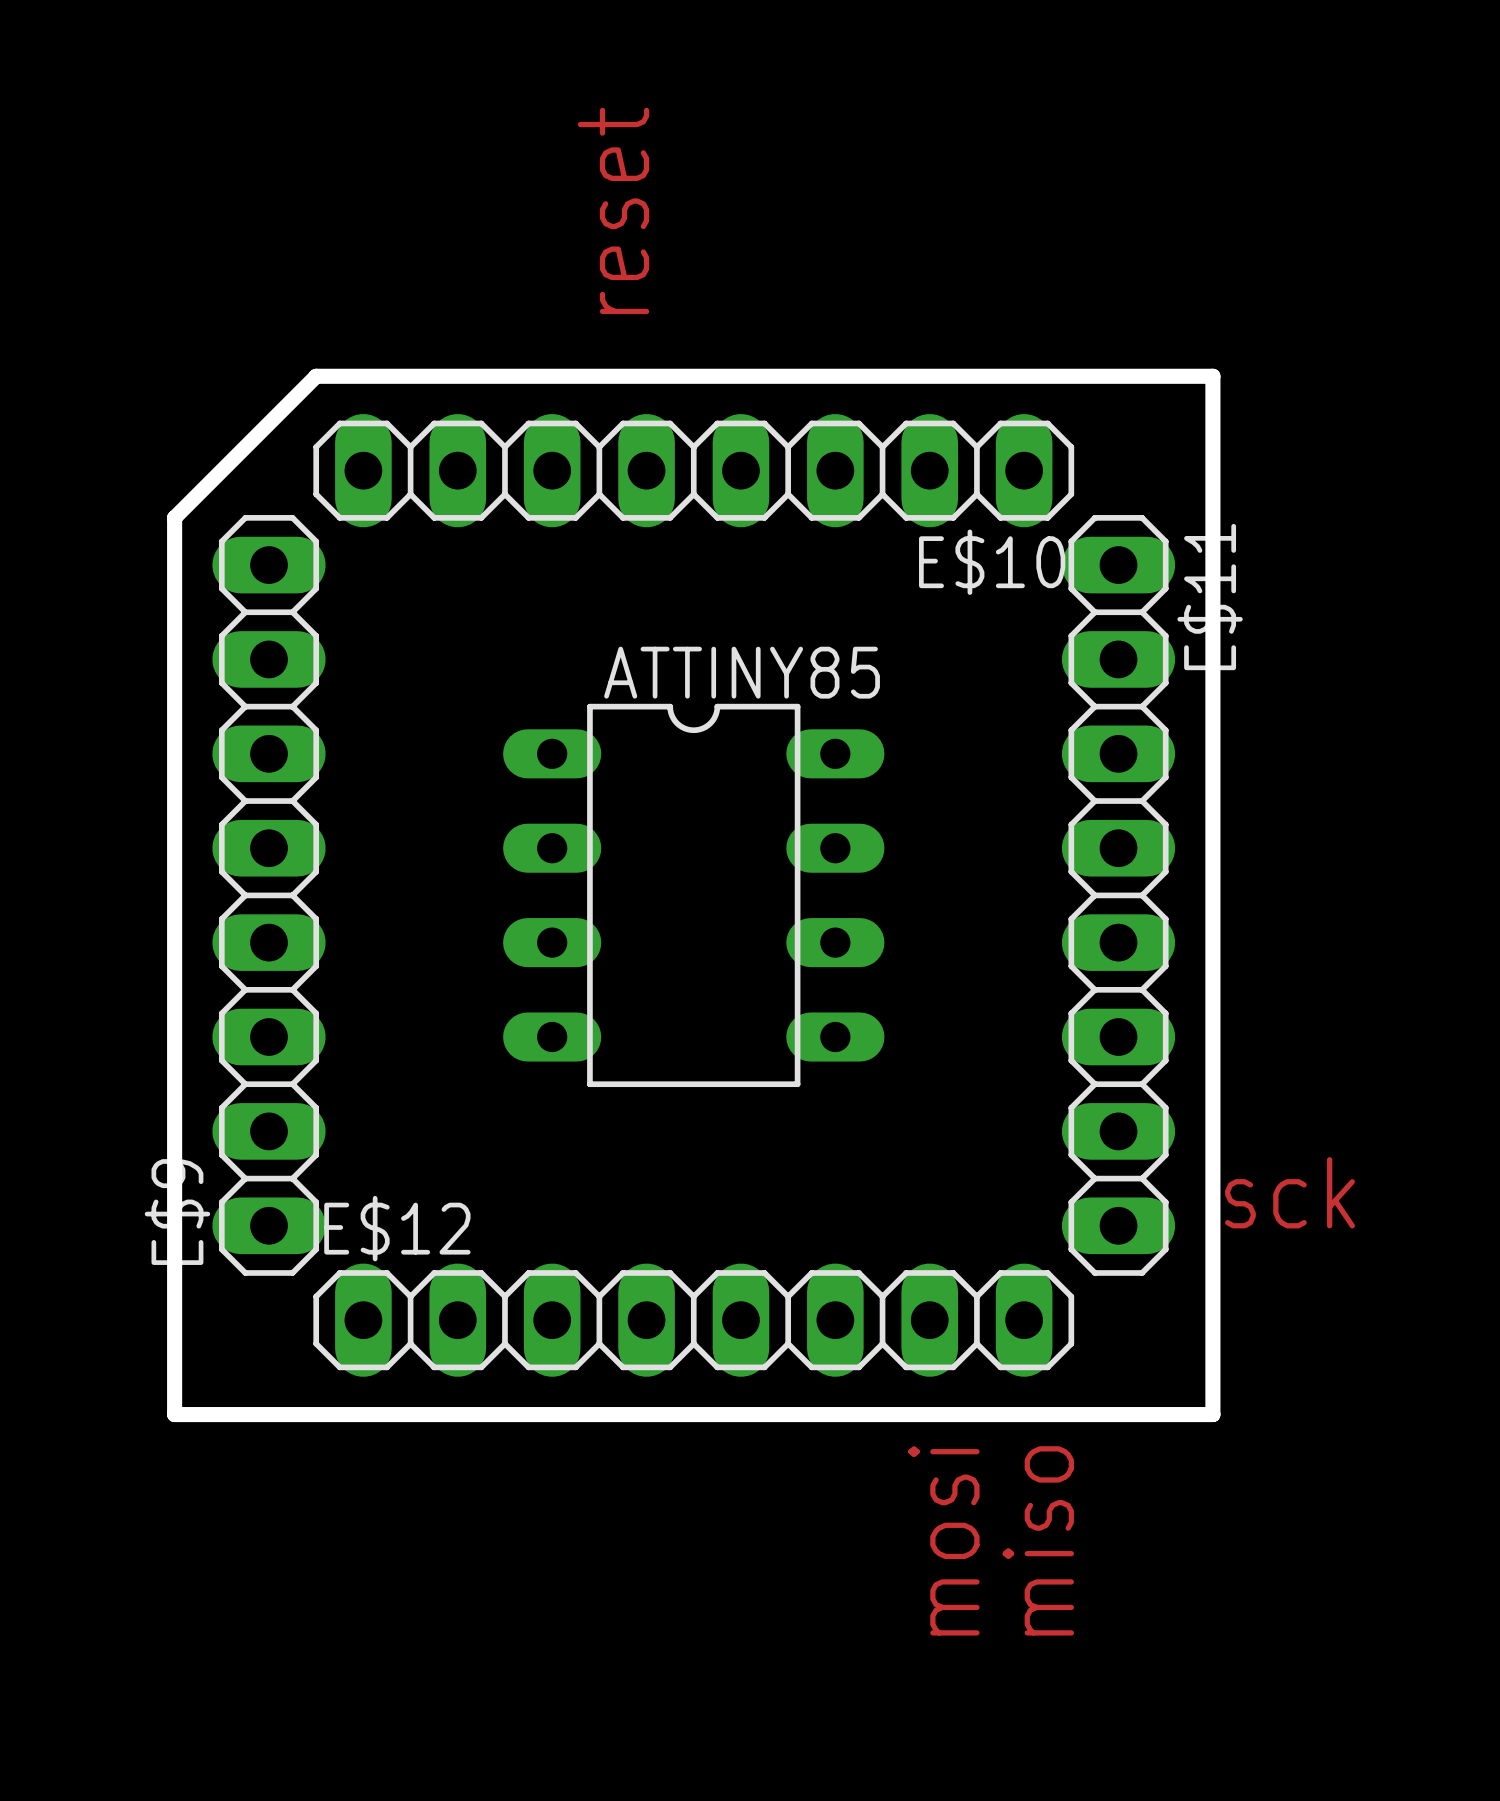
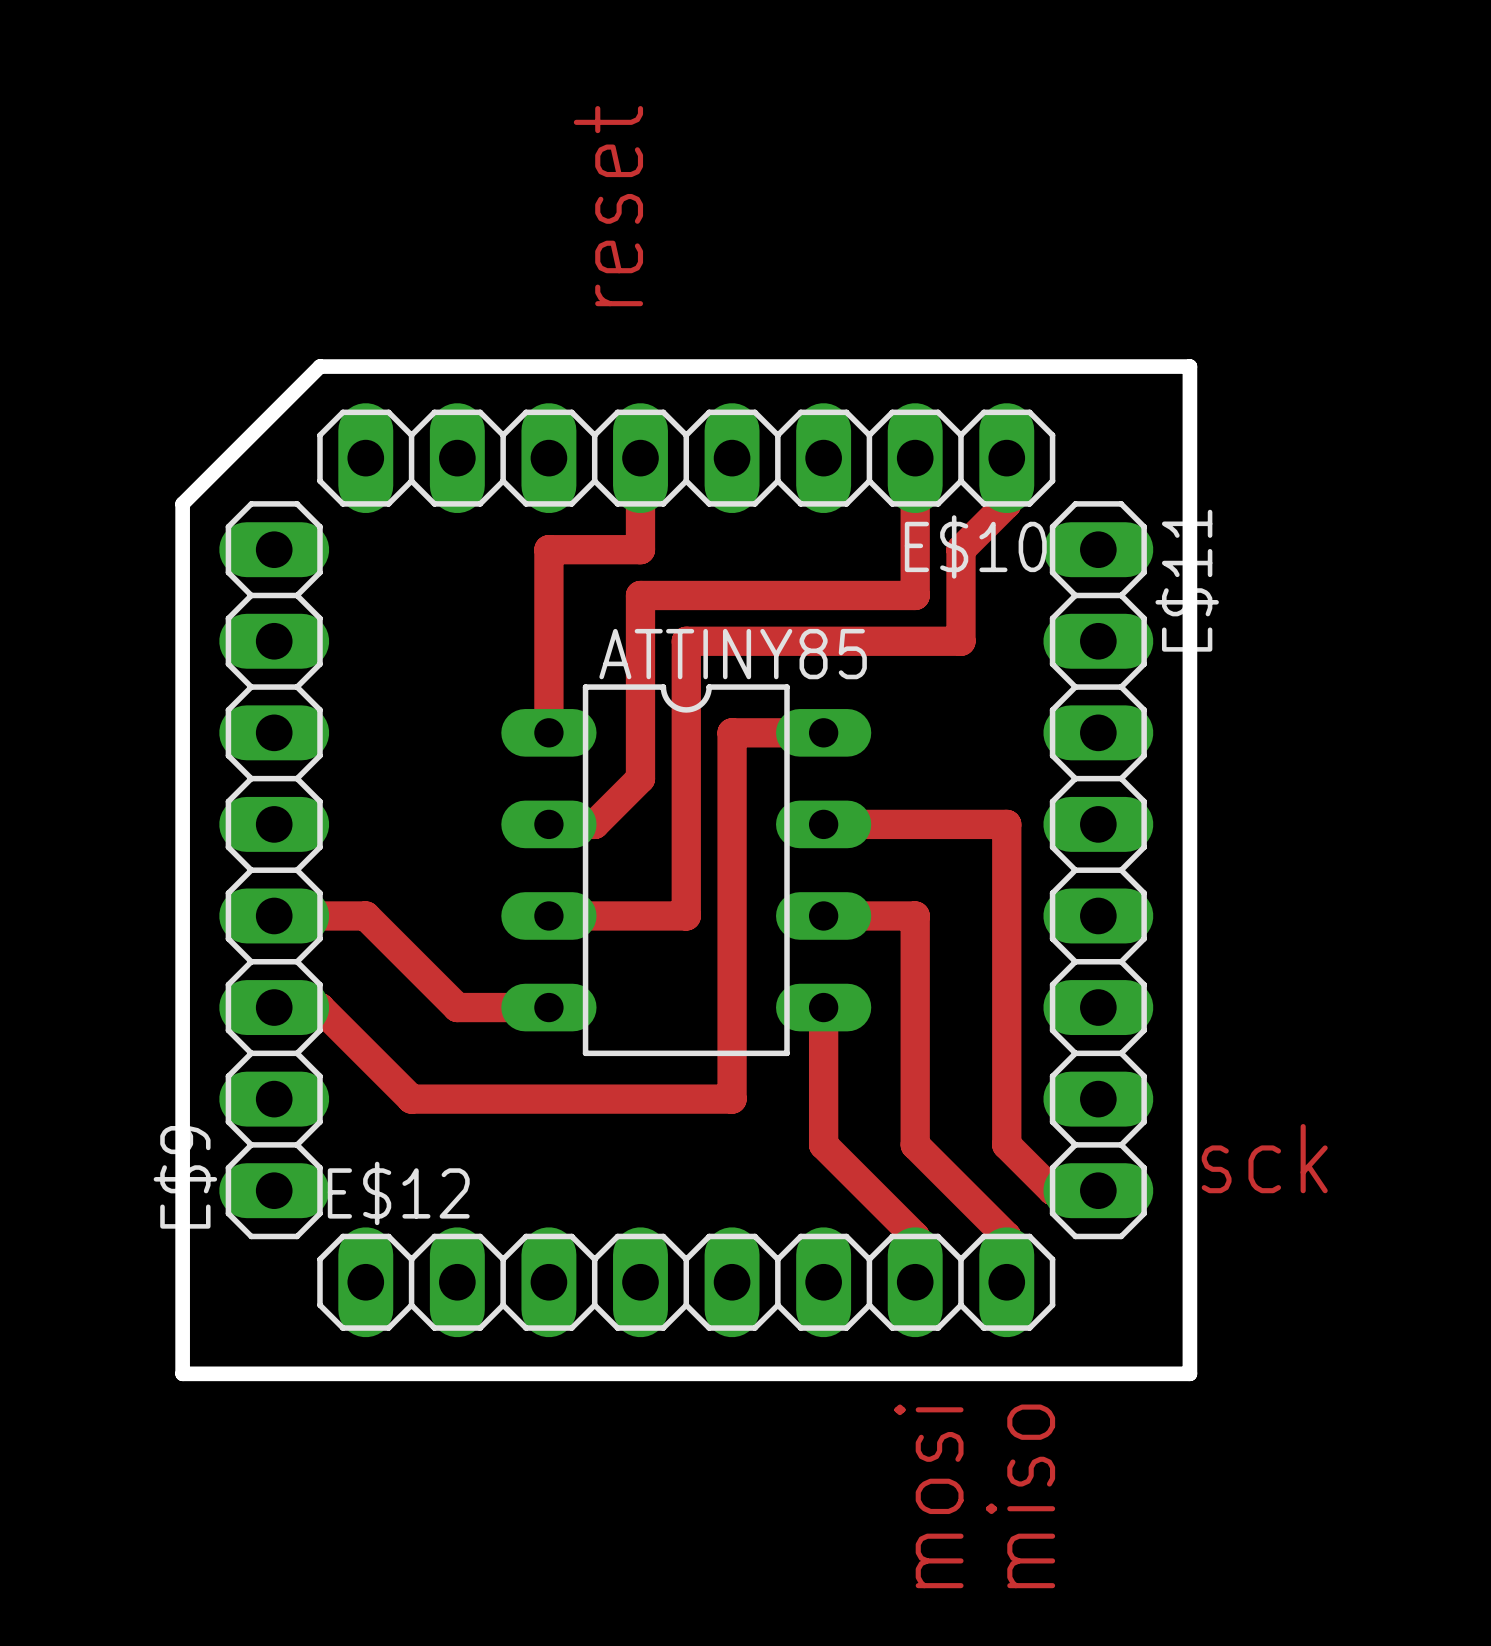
track: none -> (640, 458) (640, 549) (548, 549) (548, 732)
track: none -> (915, 458) (915, 595) (640, 595) (640, 778) (594, 824) (548, 824)
track: none -> (1006, 458) (1006, 503) (960, 549) (960, 641) (686, 641) (686, 915) (548, 915)
track: none -> (823, 732) (732, 732) (732, 1099) (411, 1099) (319, 1007) (274, 1007)
track: none -> (823, 824) (1006, 824) (1006, 1144) (1052, 1190) (1098, 1190)
track: none -> (274, 915) (365, 915) (457, 1007) (548, 1007)
track: none -> (823, 915) (915, 915) (915, 1144) (1006, 1236) (1006, 1282)
track: none -> (823, 1007) (823, 1144) (915, 1236) (915, 1282)

